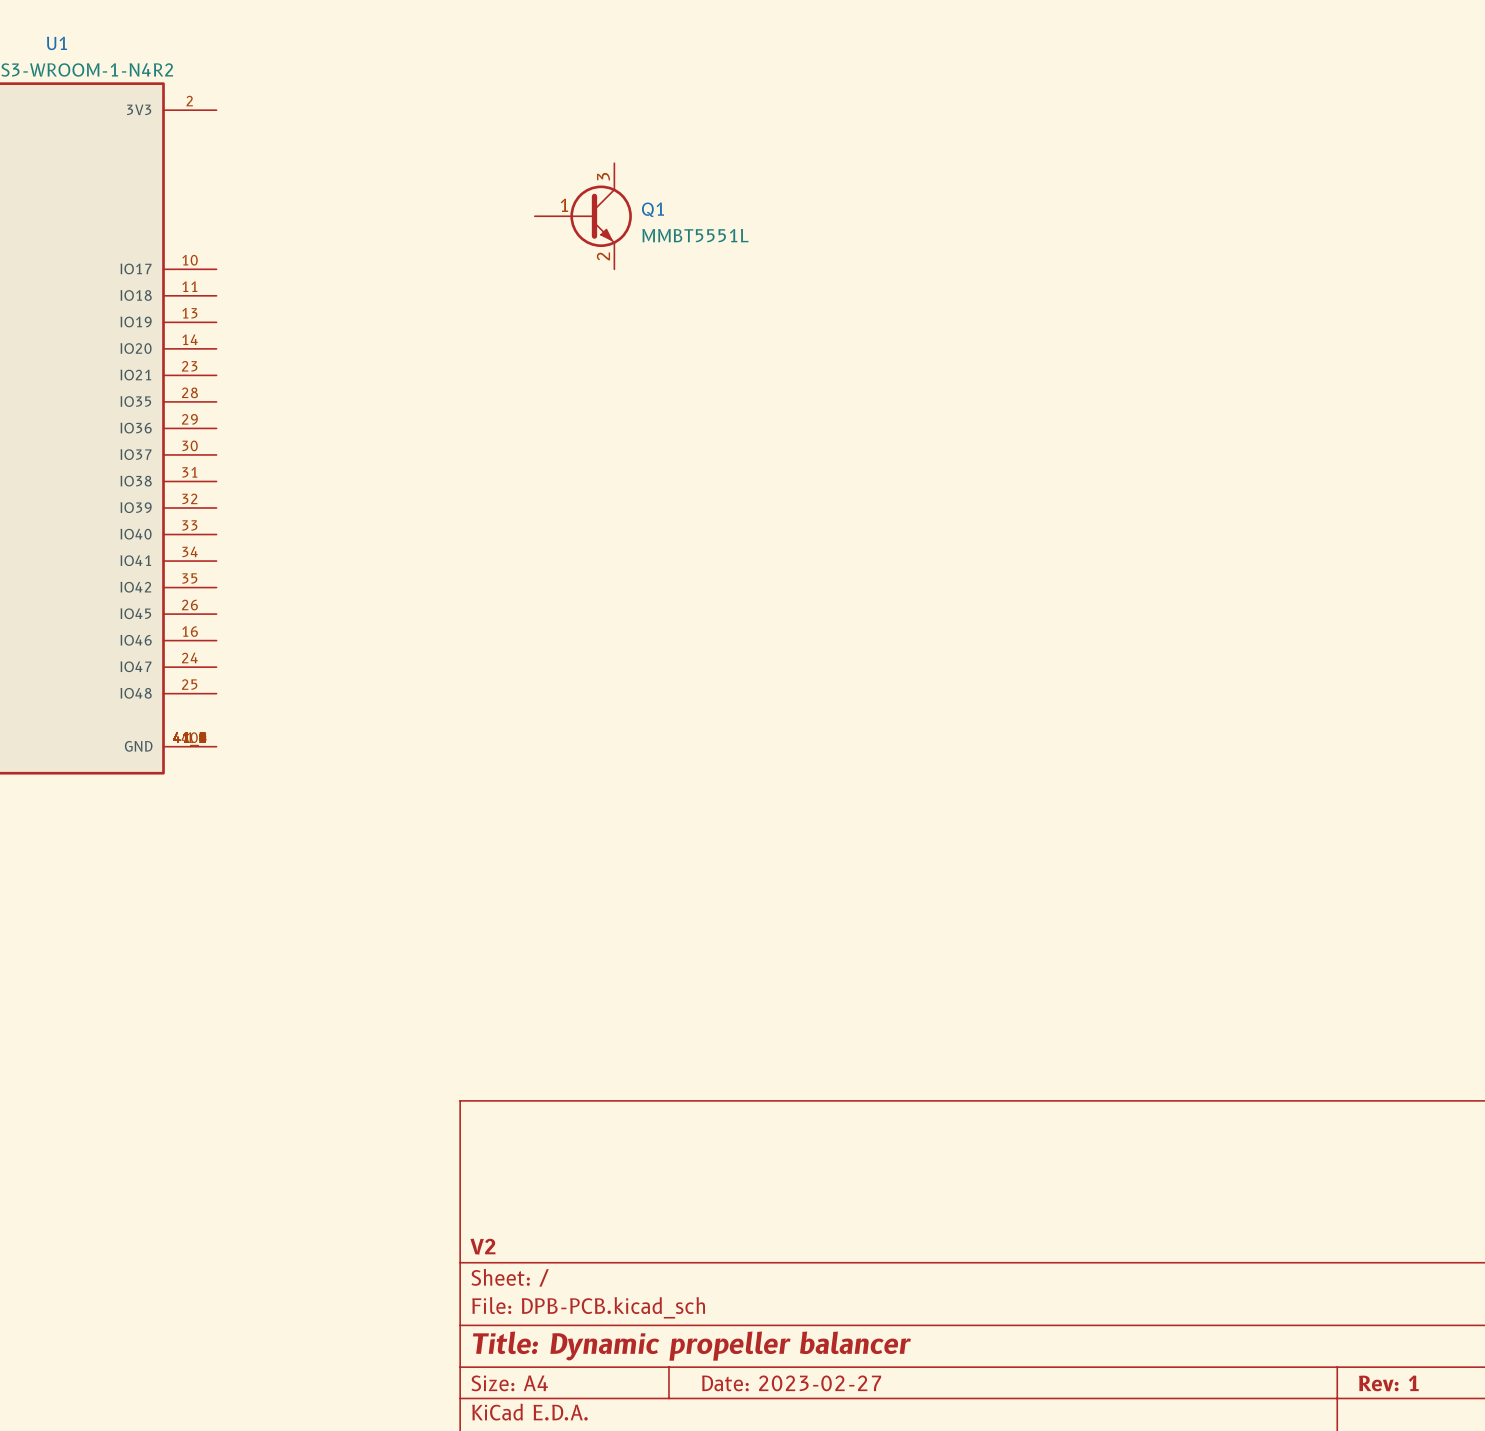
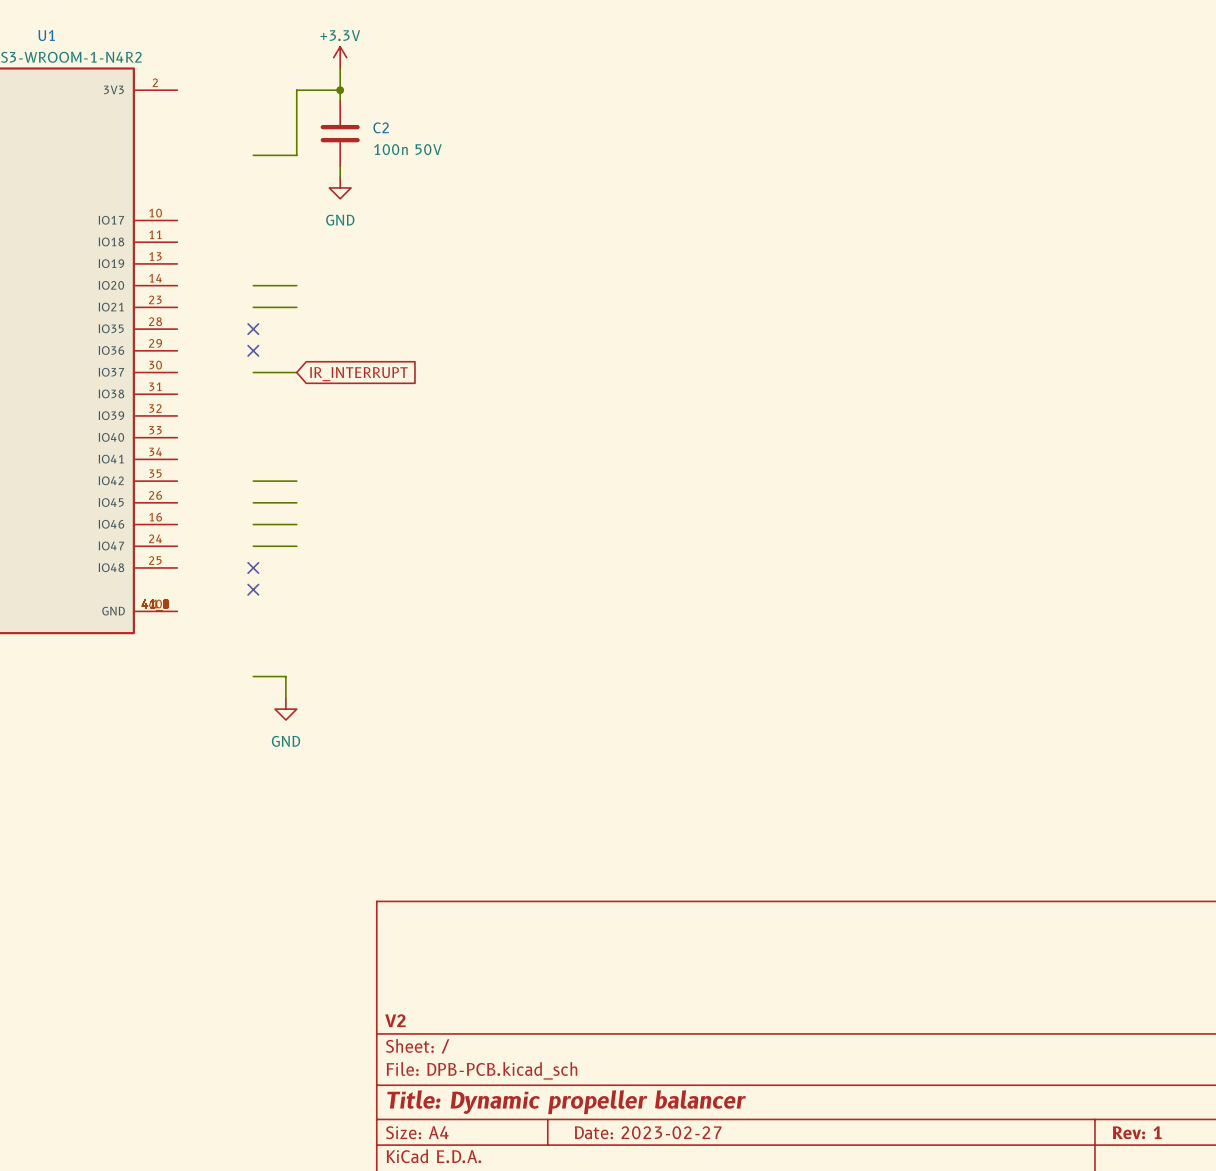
power symbol: none -> +3.3V (340, 57)
wire: none -> (340, 68) (340, 101)
wire: none -> (340, 90) (296, 90) (296, 155) (253, 155)
junction: none -> (340, 90)
C2: none -> 100n 50V (340, 133)
wire: none -> (340, 166) (340, 177)
Q1: MMBT5551L (583, 216) -> none
power symbol: none -> GND (340, 187)
wire: none -> (253, 285) (296, 285)
wire: none -> (253, 307) (296, 307)
no-connect mark: none -> (253, 329)
no-connect mark: none -> (253, 350)
wire: none -> (253, 372) (296, 372)
global label: none -> IR_INTERRUPT (358, 374)
wire: none -> (253, 481) (296, 481)
wire: none -> (253, 502) (296, 502)
wire: none -> (253, 524) (296, 524)
wire: none -> (253, 546) (296, 546)
no-connect mark: none -> (253, 567)
no-connect mark: none -> (253, 589)
wire: none -> (253, 676) (285, 676) (285, 698)
power symbol: none -> GND (285, 709)

